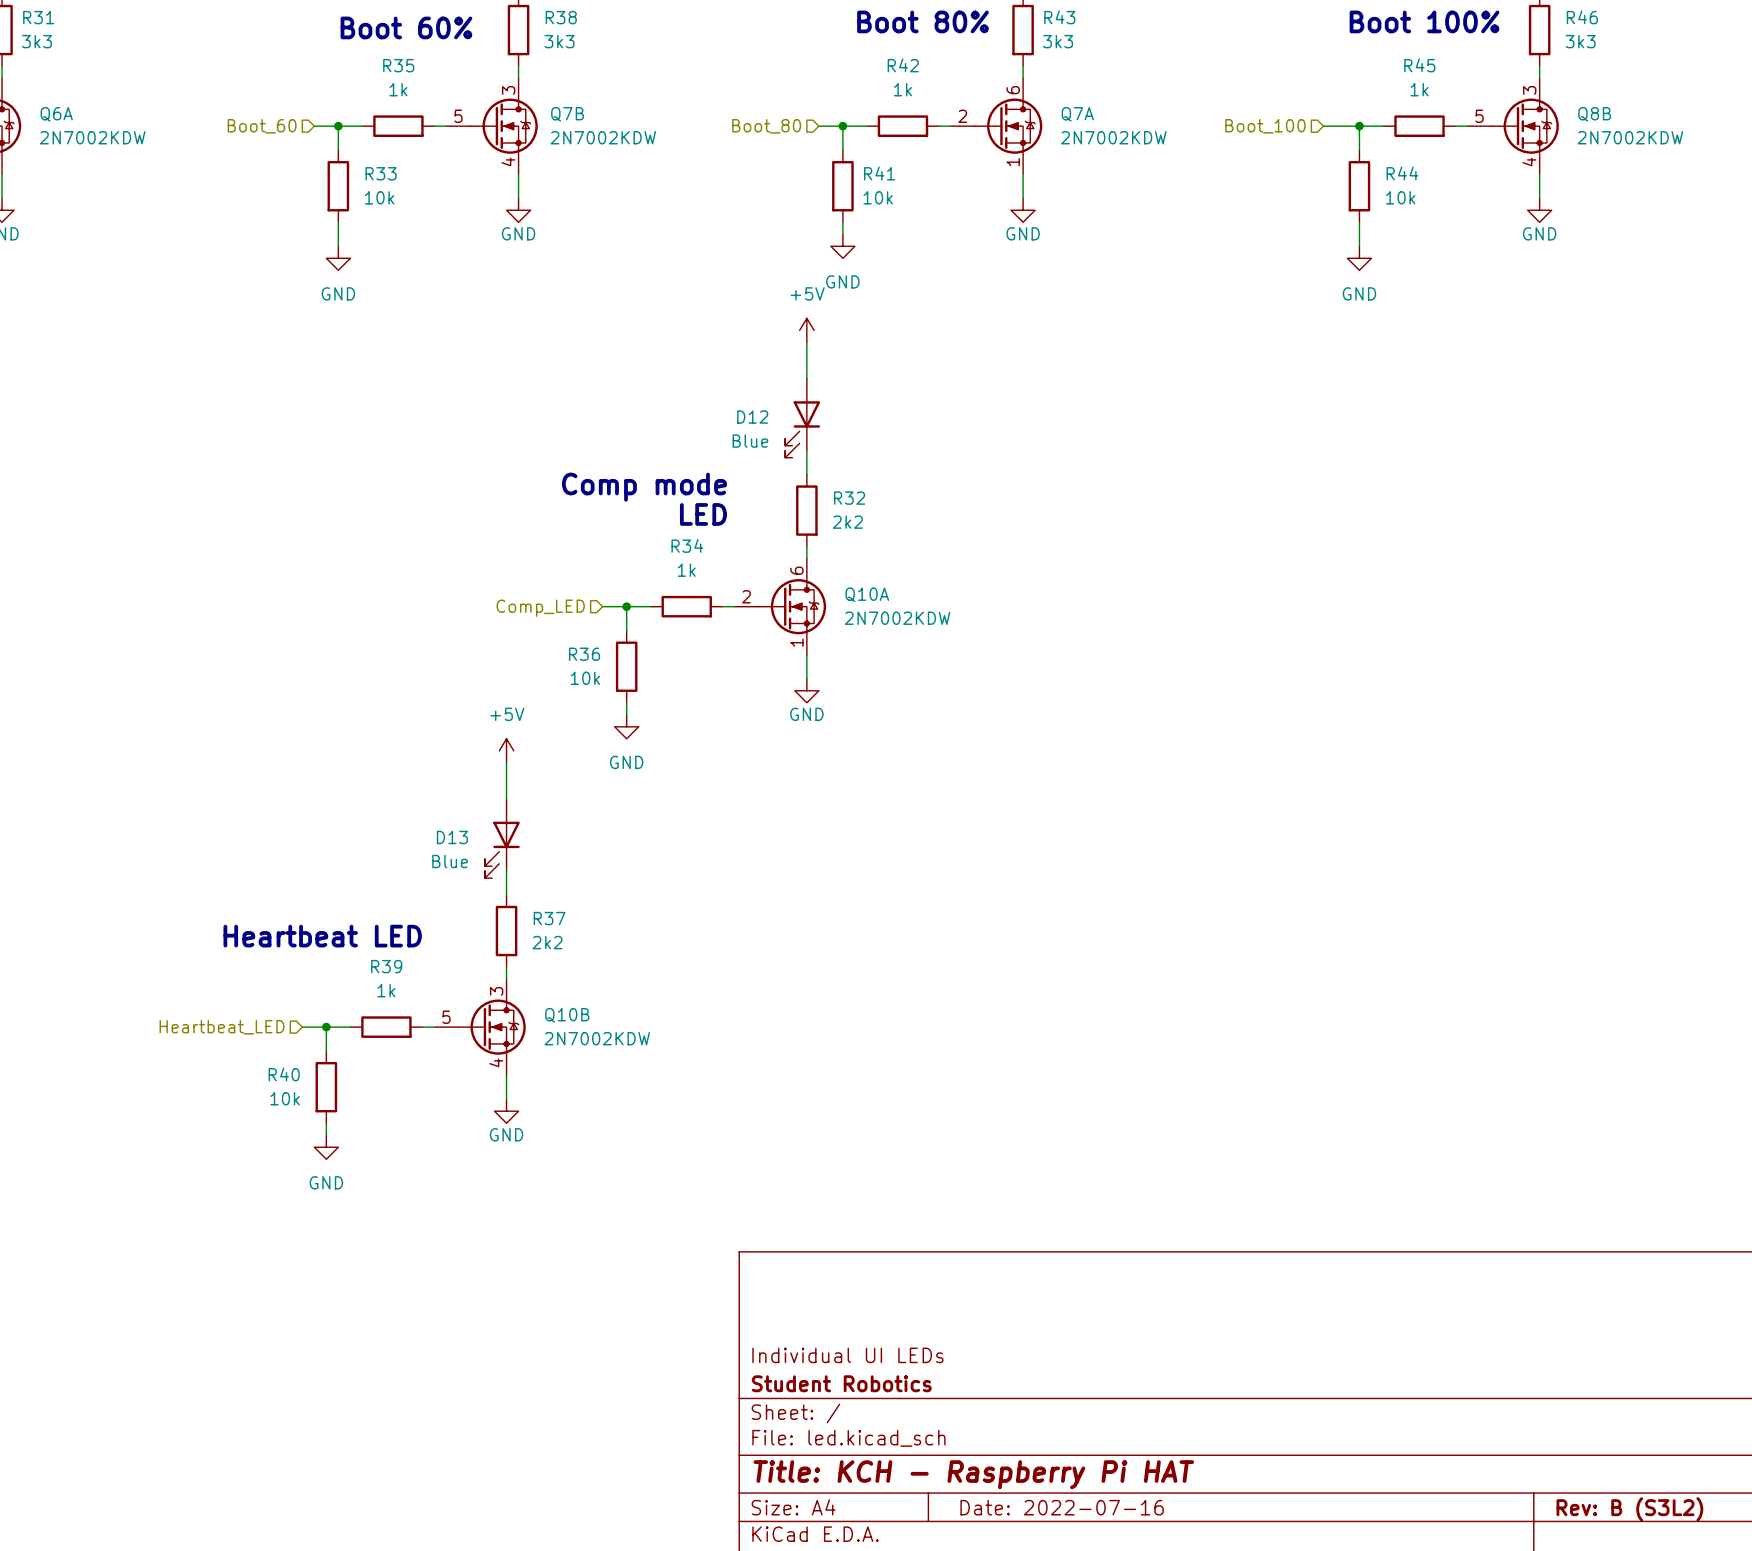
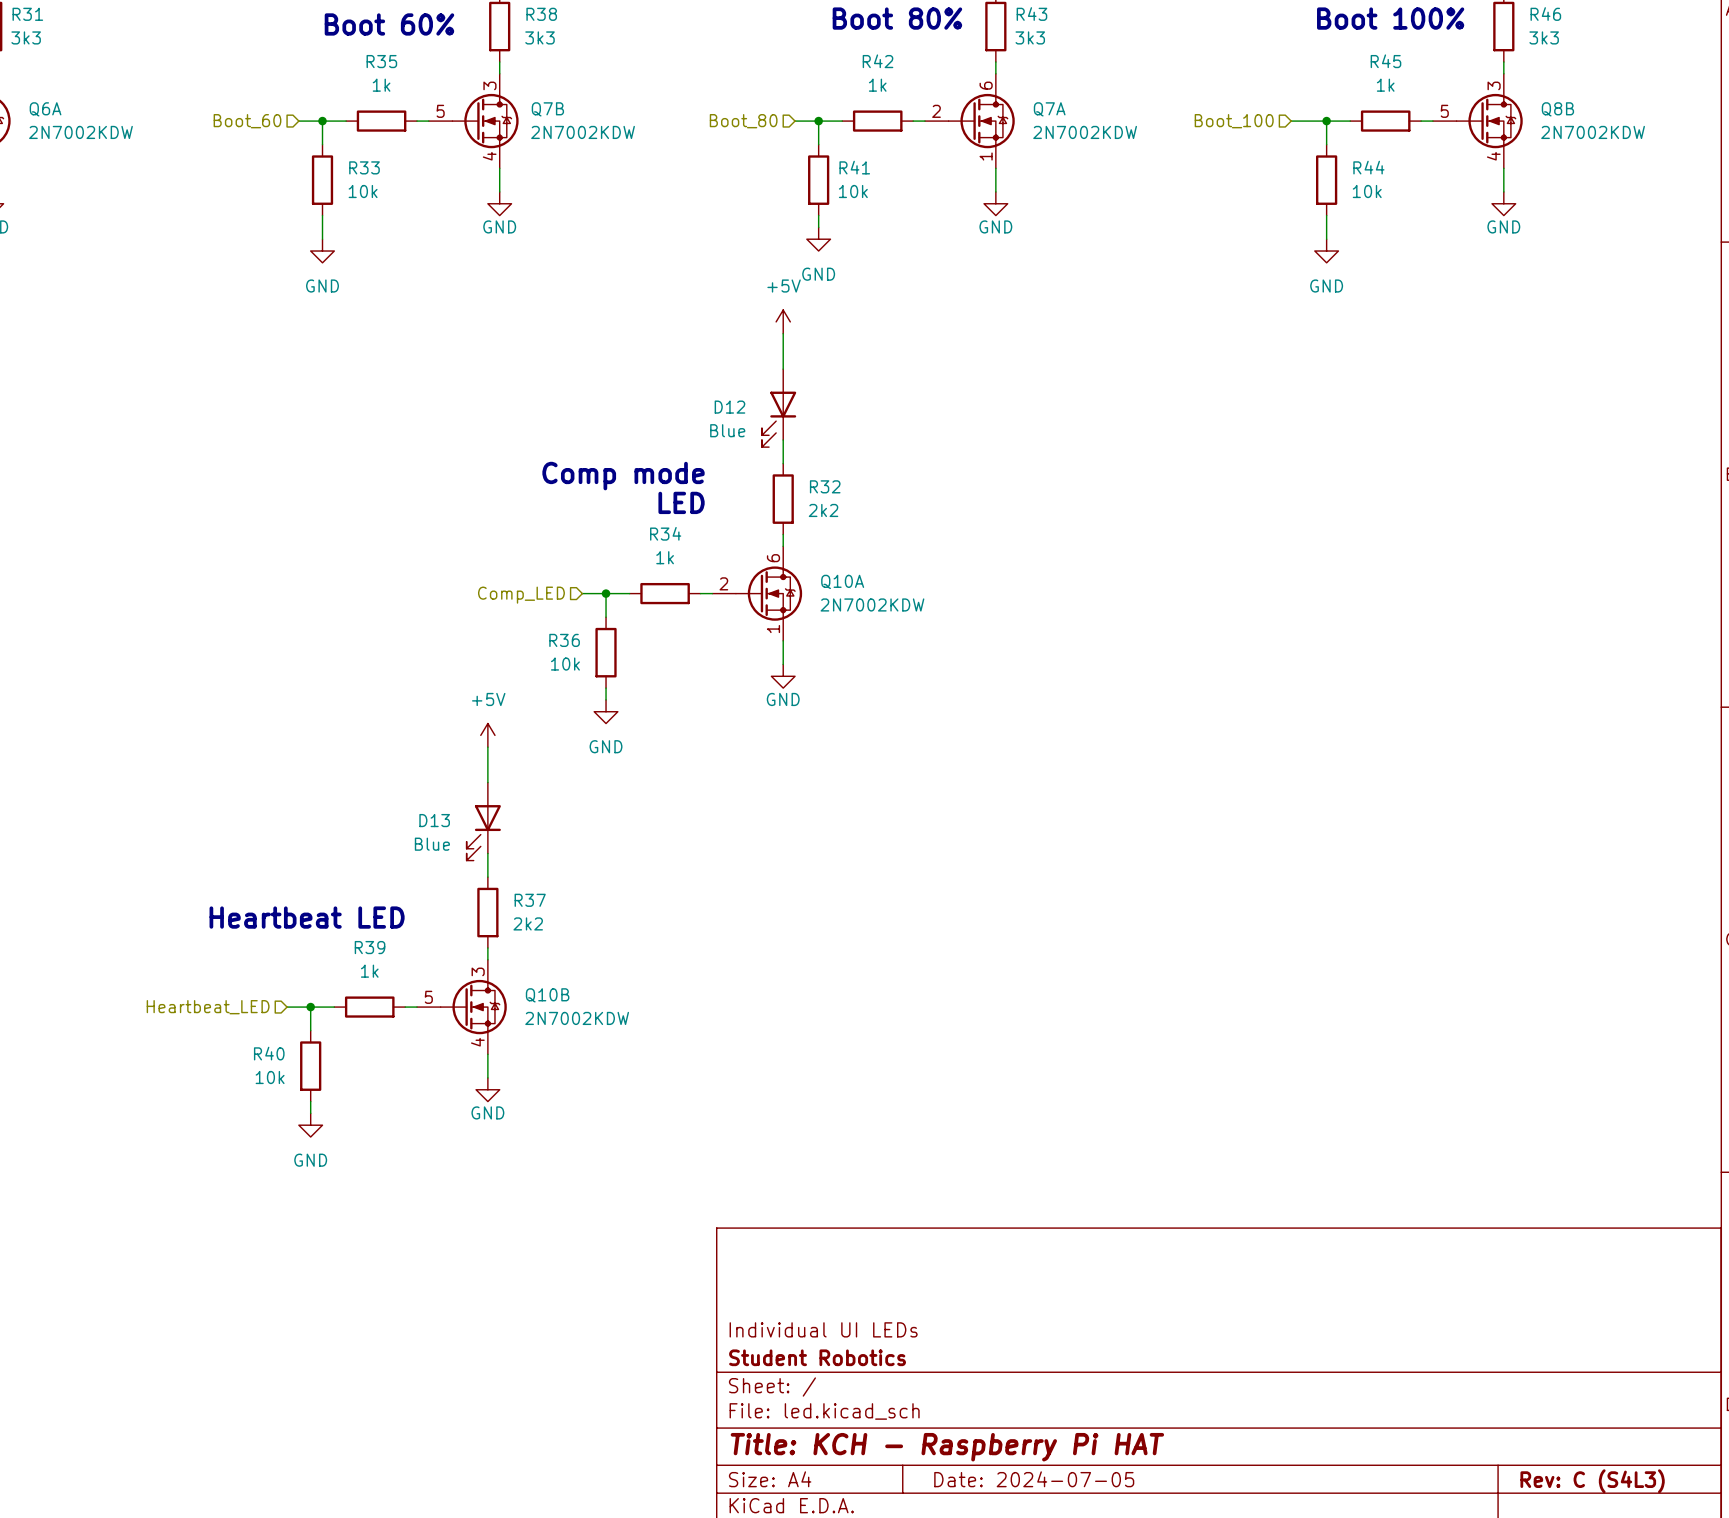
title block: Date: 2022-07-16 (1062, 1507) -> Date: 2024-07-05 (1034, 1479)
title block: Rev: B (S3L2) (1629, 1509) -> Rev: C (S4L3) (1592, 1481)

